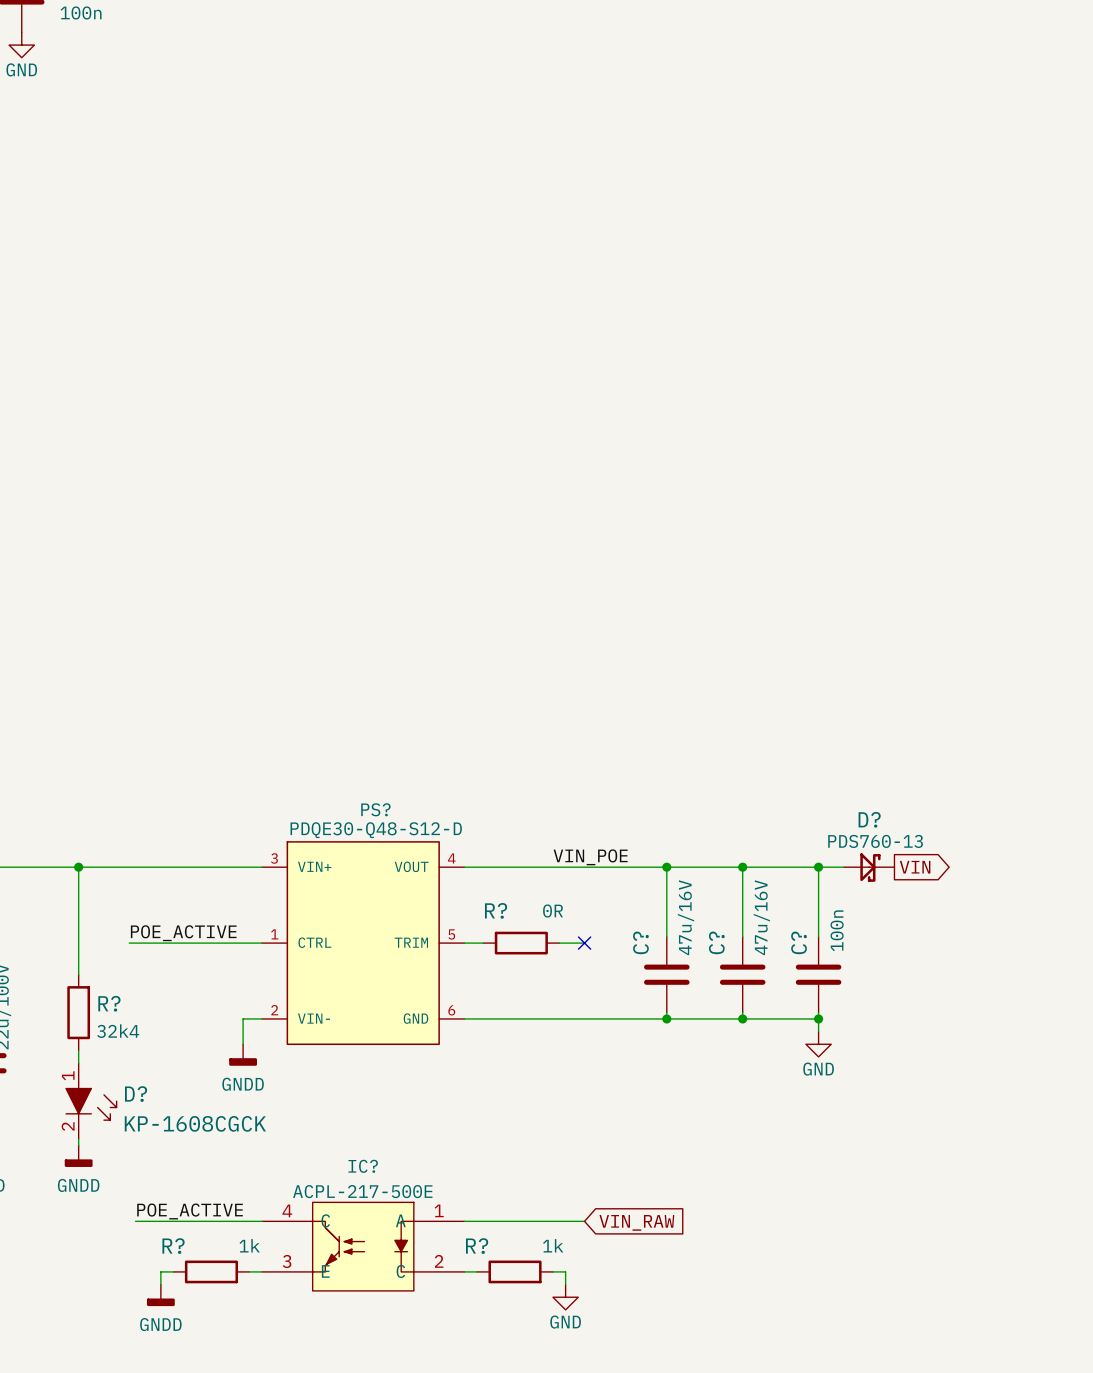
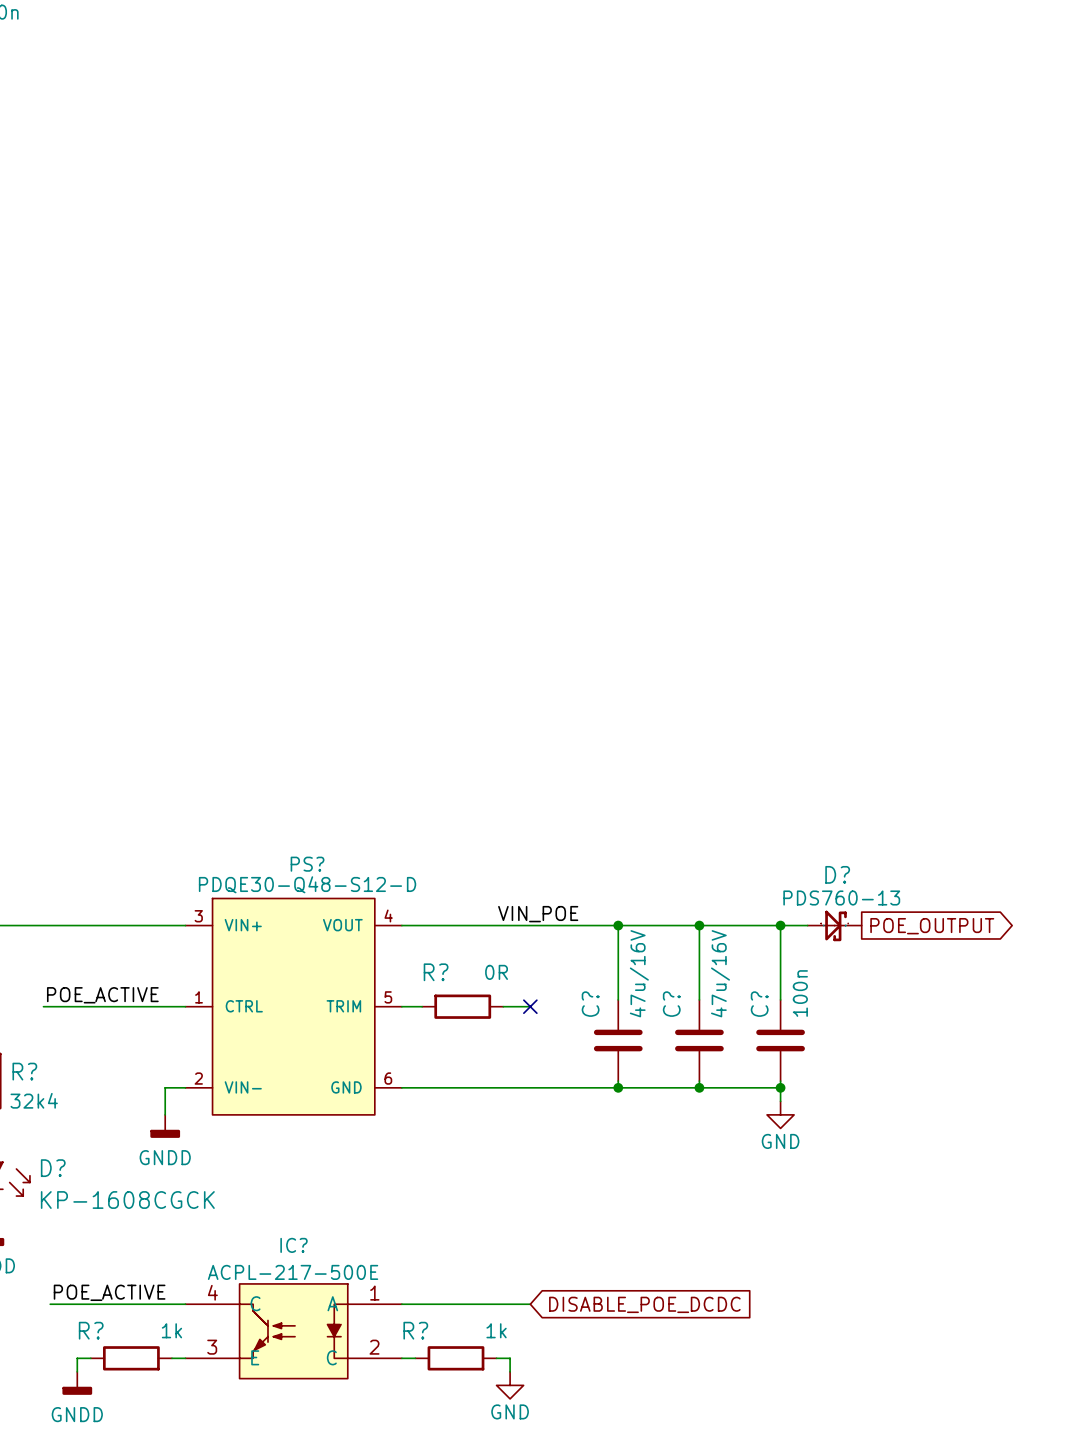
global label: VIN (915, 867) -> POE_OUTPUT (932, 926)
global label: VIN_RAW (636, 1222) -> DISABLE_POE_DCDC (644, 1304)

